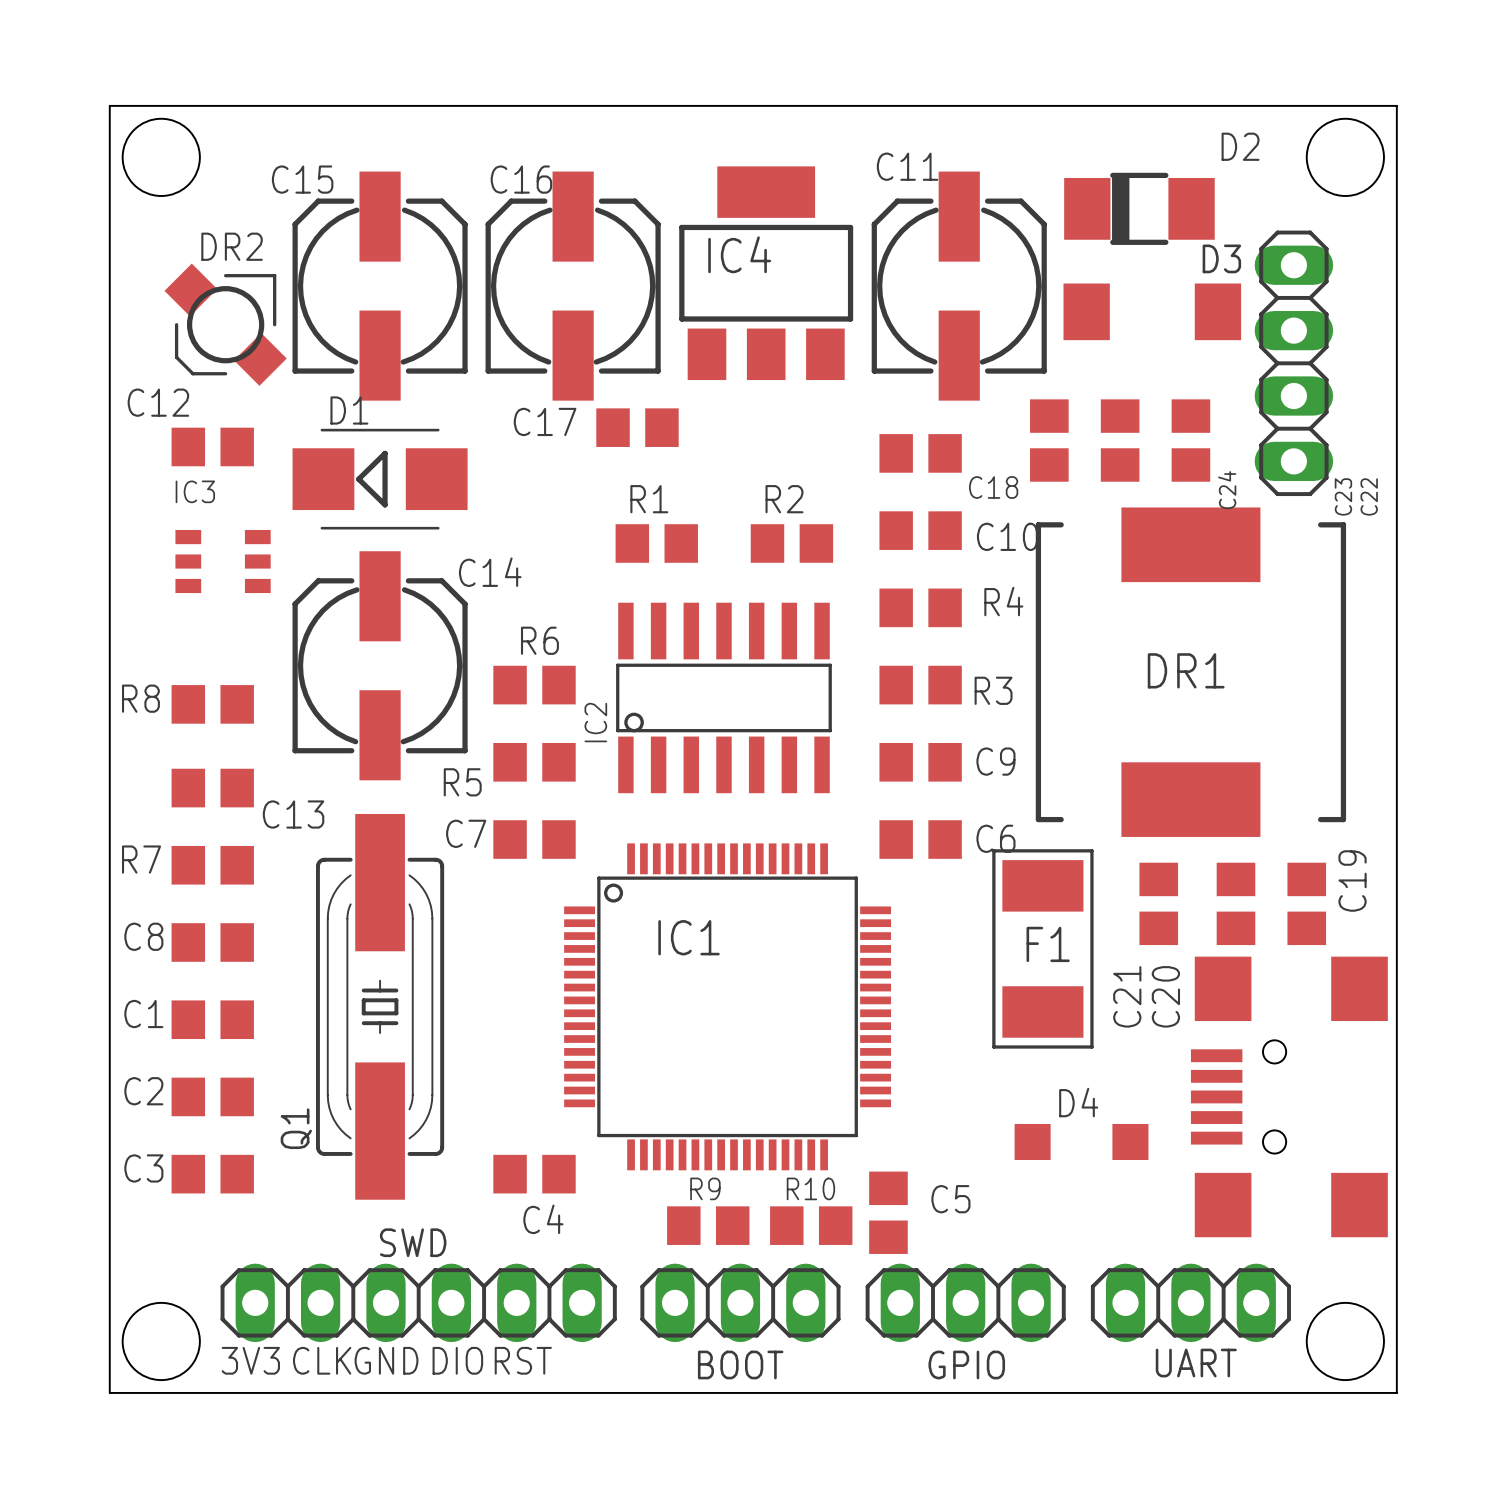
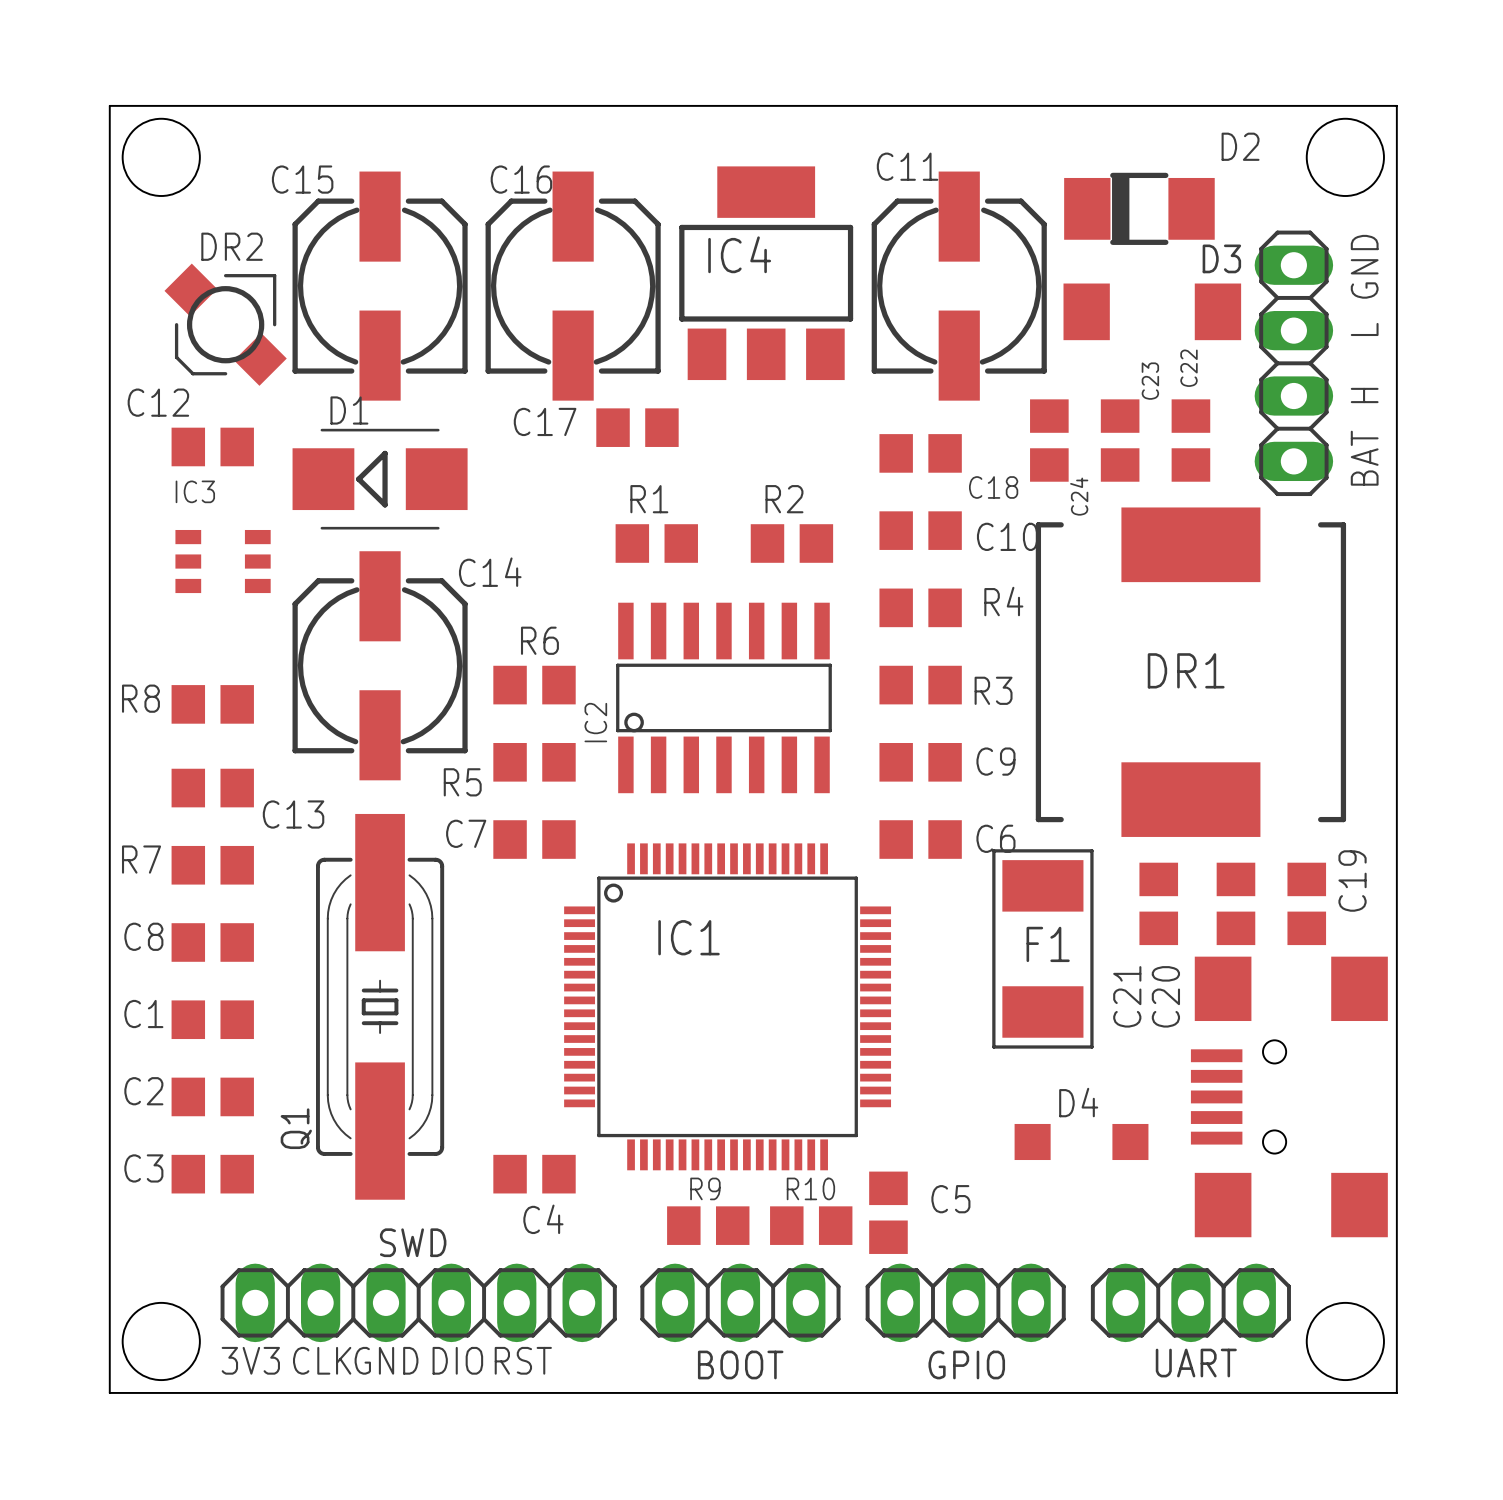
text: none -> GND (1364, 266)
text: none -> L (1364, 329)
text: none -> H (1364, 395)
text: none -> BAT (1364, 458)
C24 name position: C24 (1227, 490) -> C24 (1079, 496)
C23 name position: C23 (1343, 496) -> C23 (1150, 381)
C22 name position: C22 (1369, 496) -> C22 (1188, 368)

